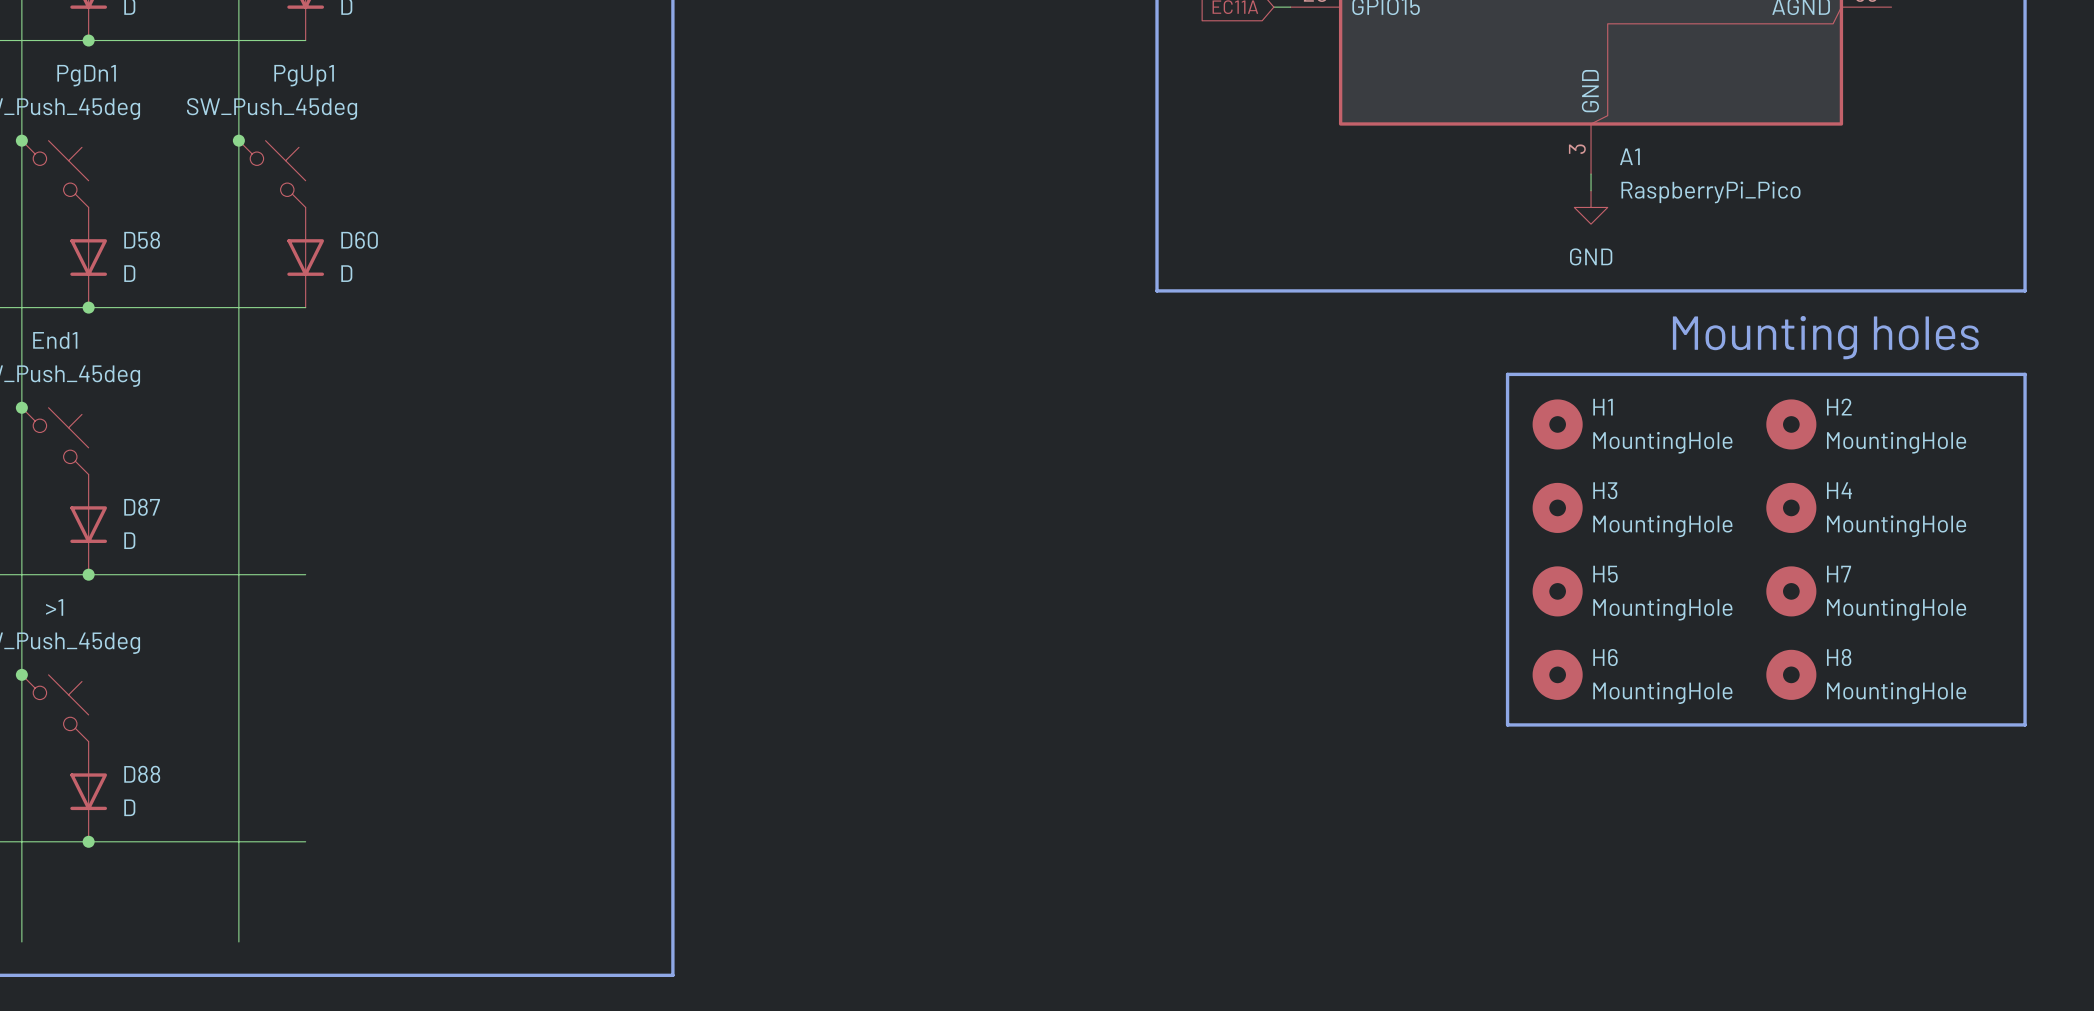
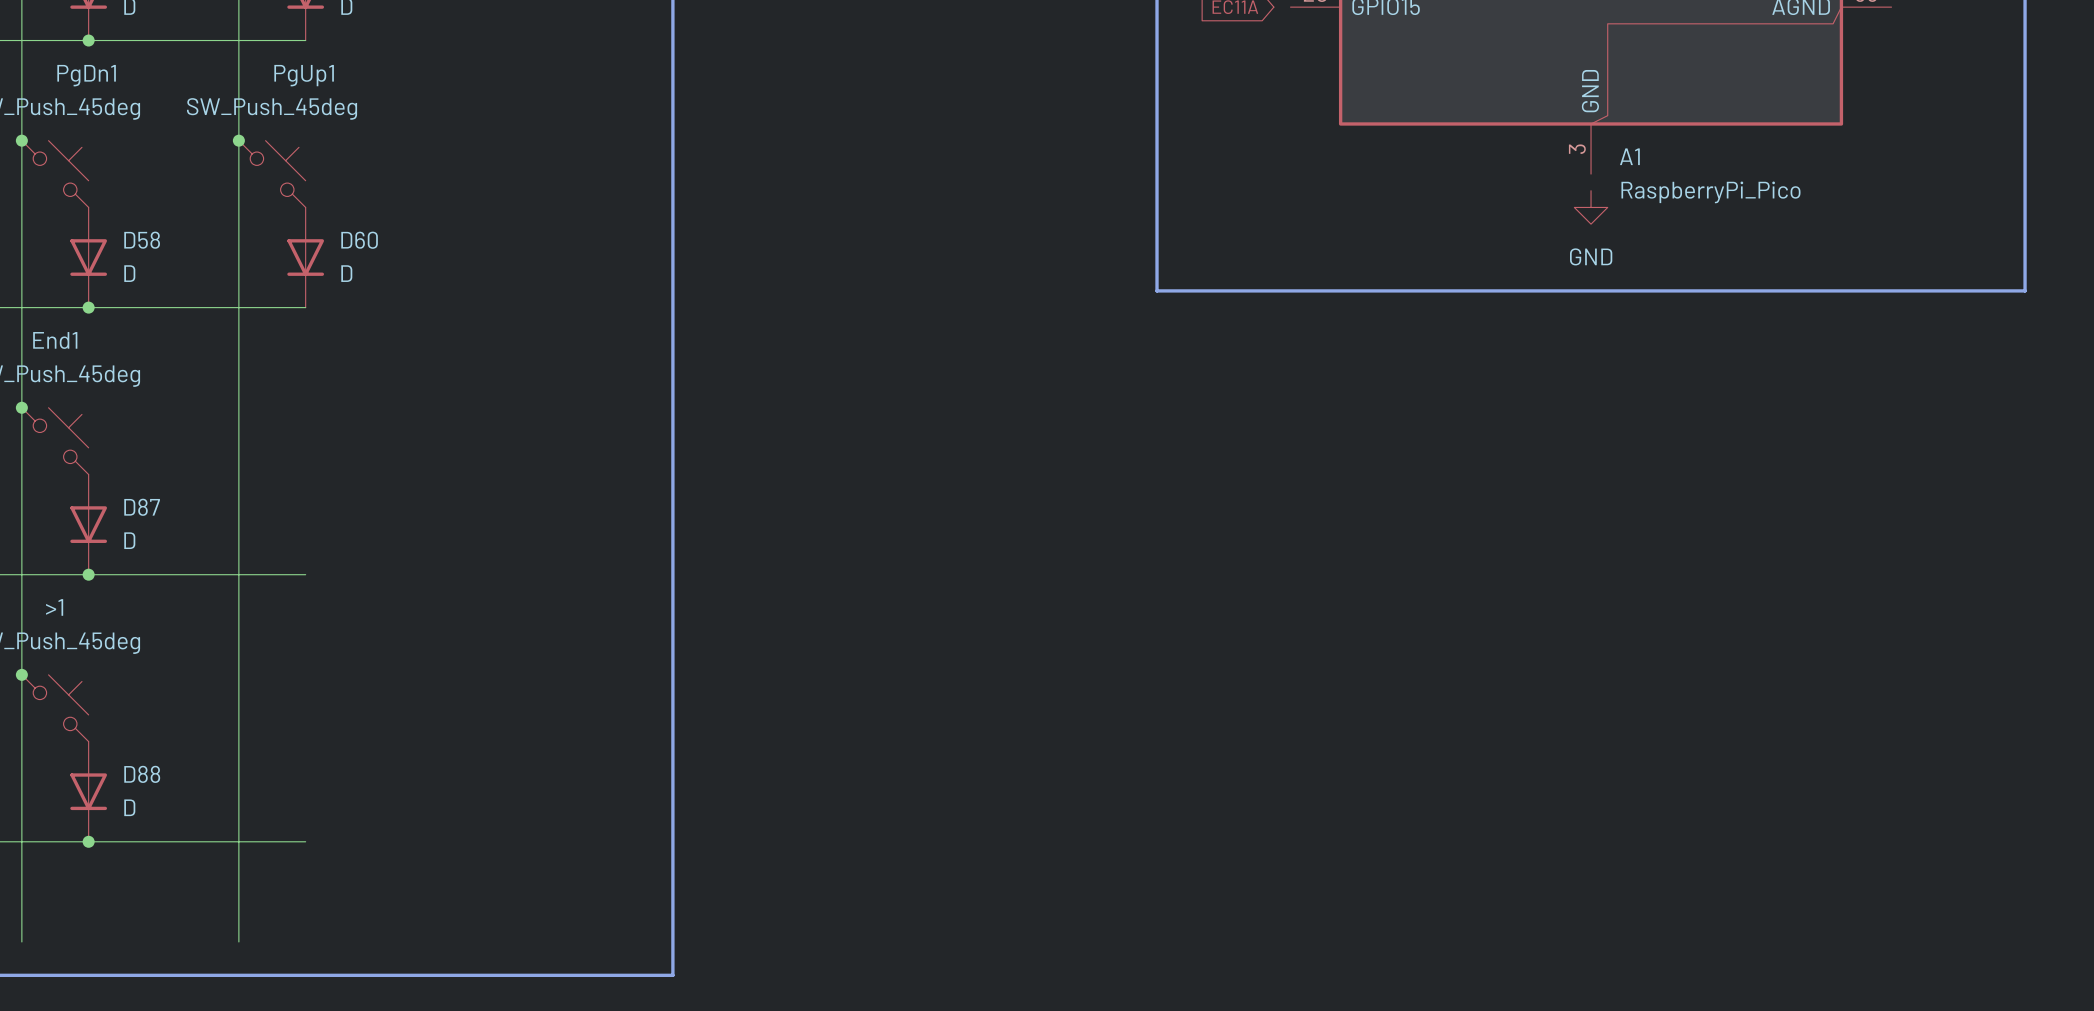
wire: (1273, 7) (1290, 7) -> none
wire: (1591, 174) (1591, 190) -> none
text: Mounting holes (1825, 337) -> none
line: (1507, 374) (2025, 374) (2025, 724) (1507, 724) (1507, 374) -> none
H1: MountingHole (1557, 424) -> none
H2: MountingHole (1791, 424) -> none
H3: MountingHole (1557, 507) -> none
H4: MountingHole (1791, 507) -> none
H5: MountingHole (1557, 591) -> none
H7: MountingHole (1791, 591) -> none
H6: MountingHole (1557, 674) -> none
H8: MountingHole (1791, 674) -> none

